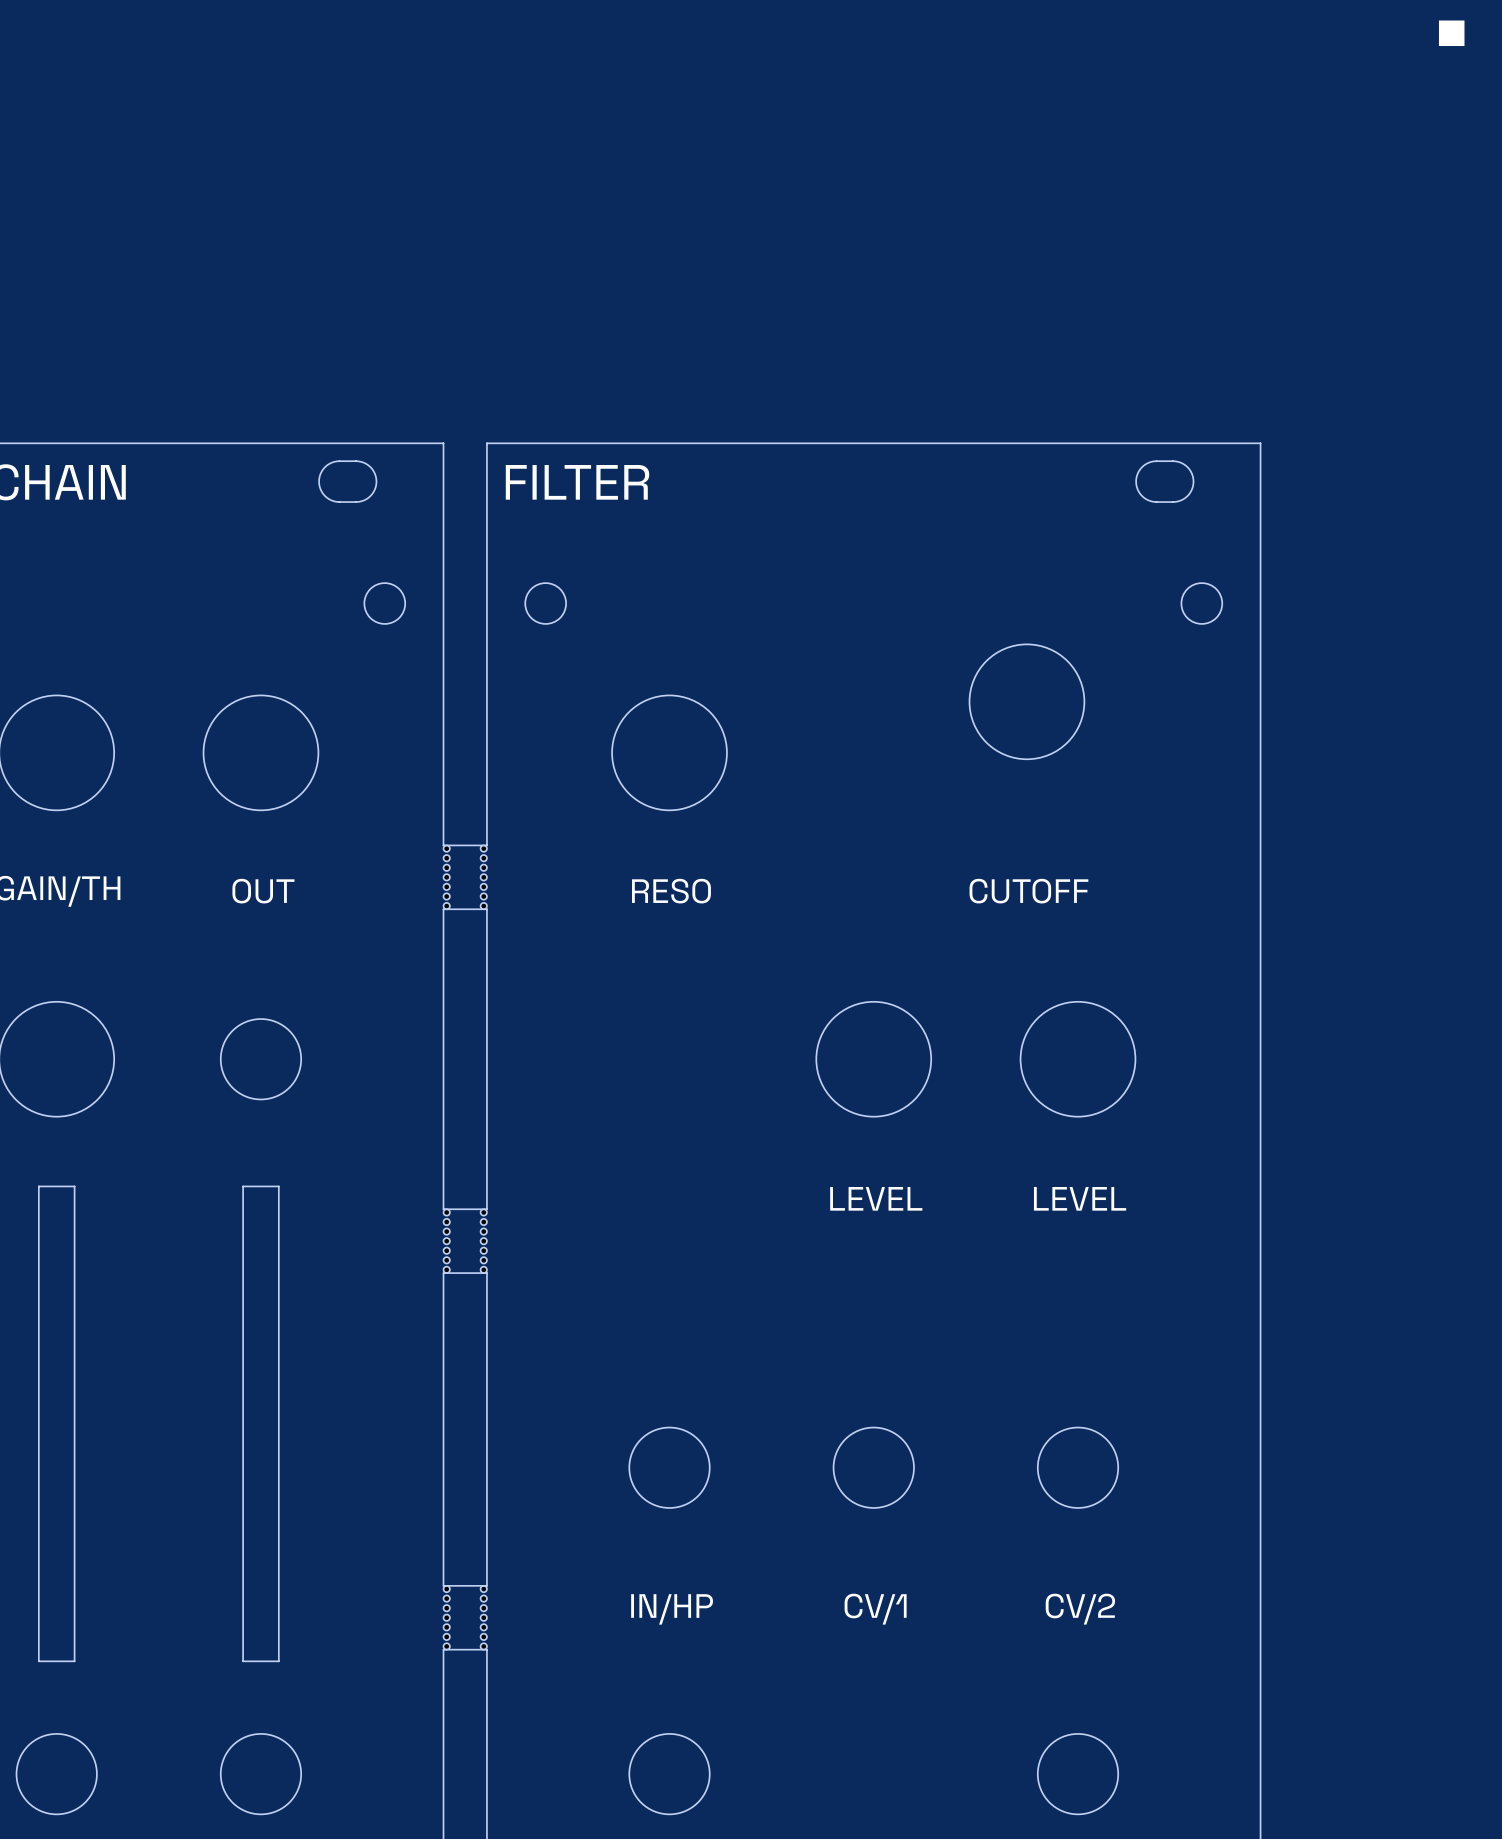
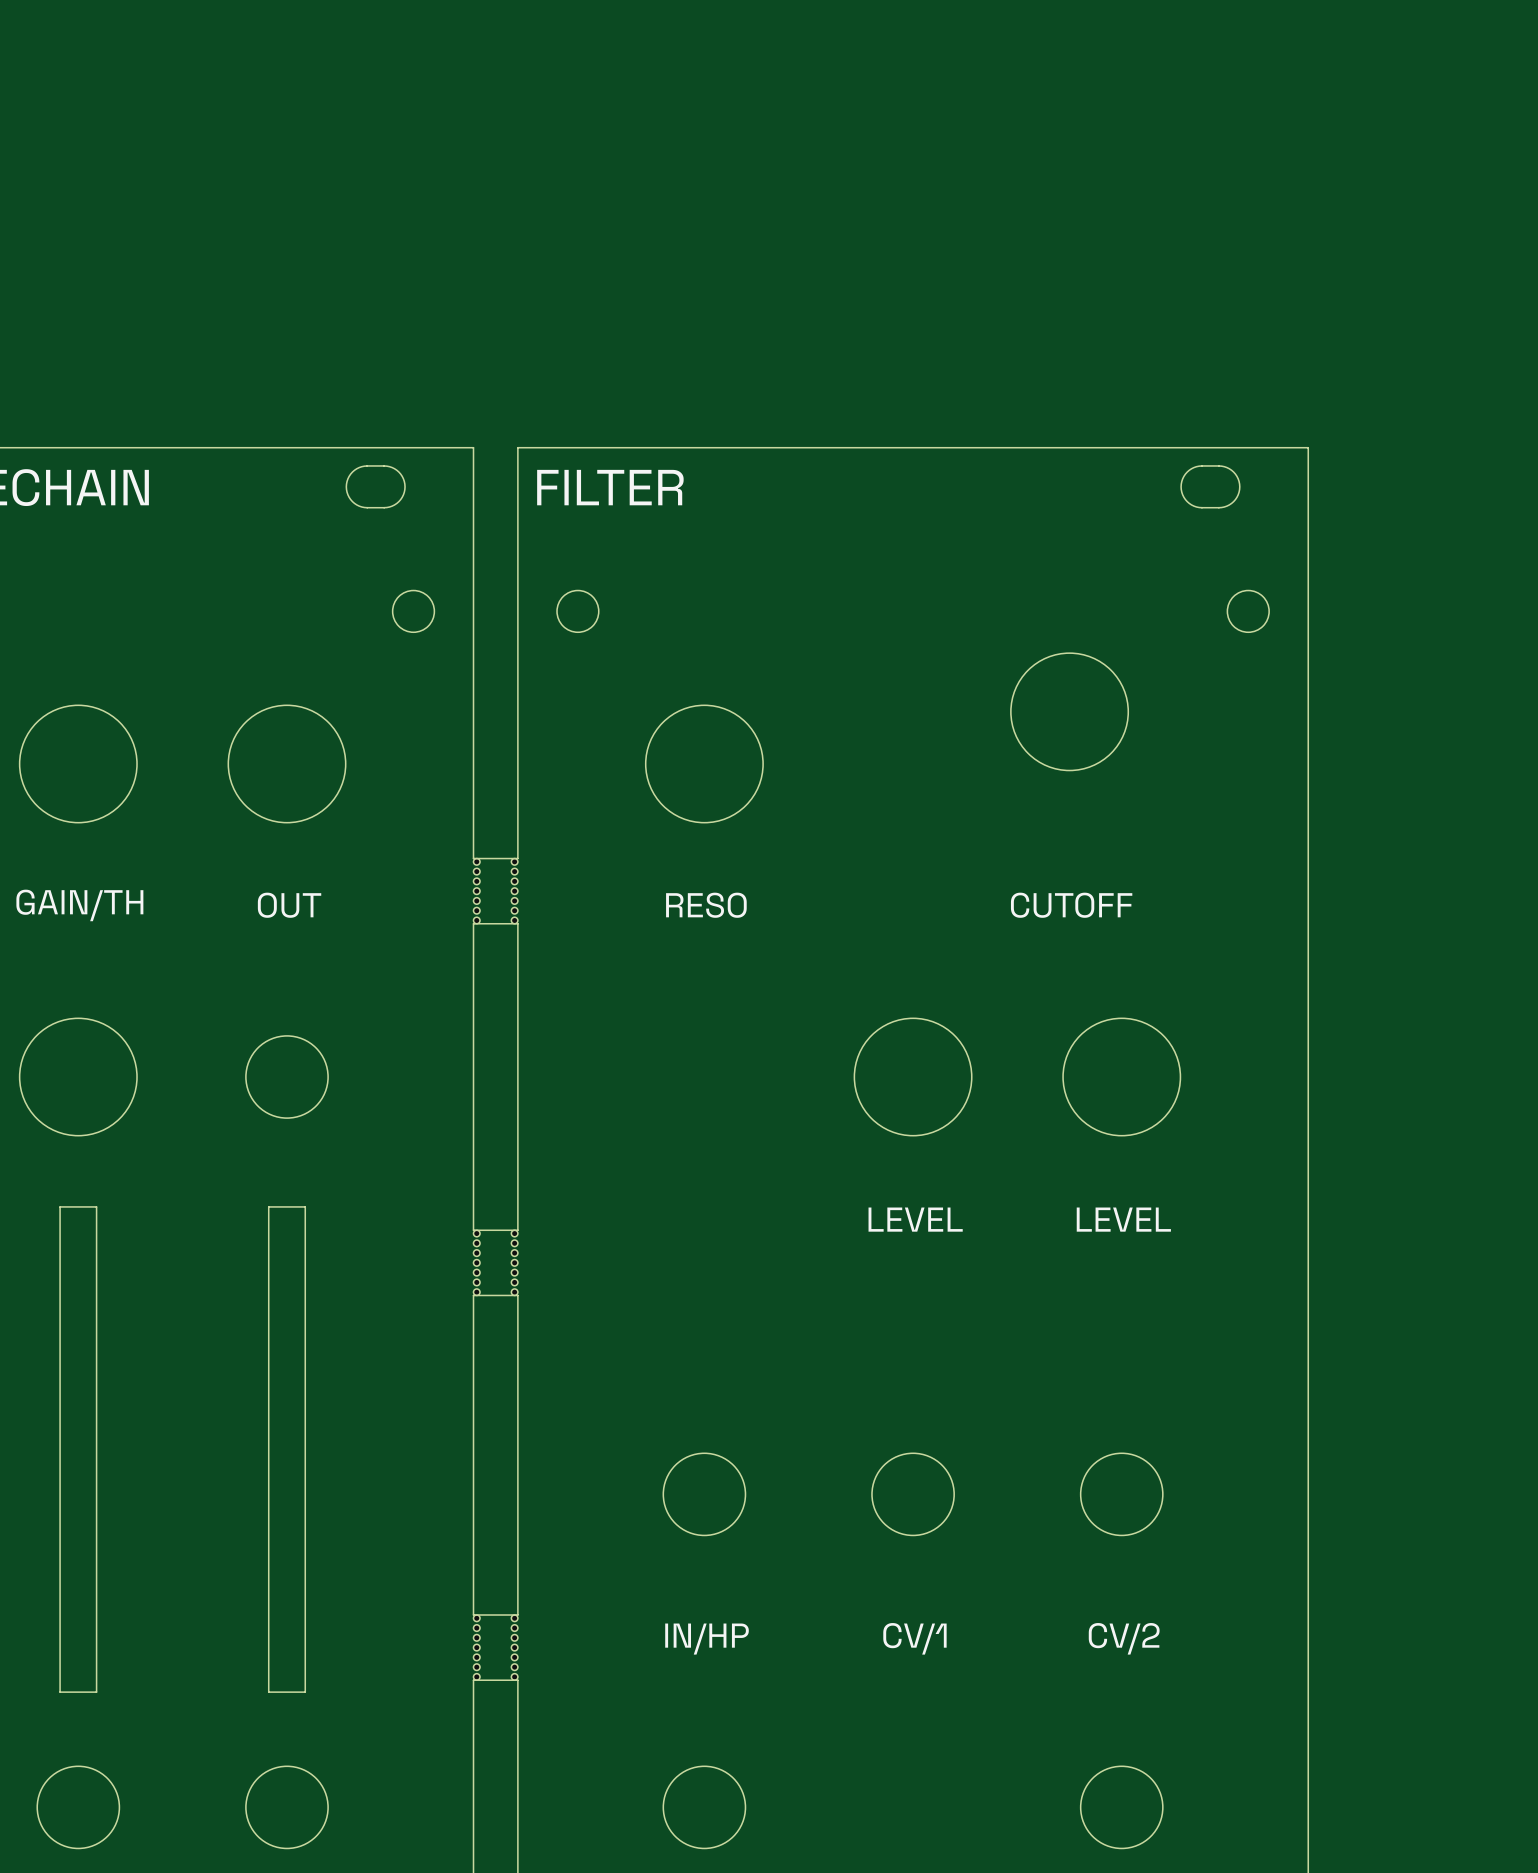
drawing: [1438, 20, 1465, 47] -> none

